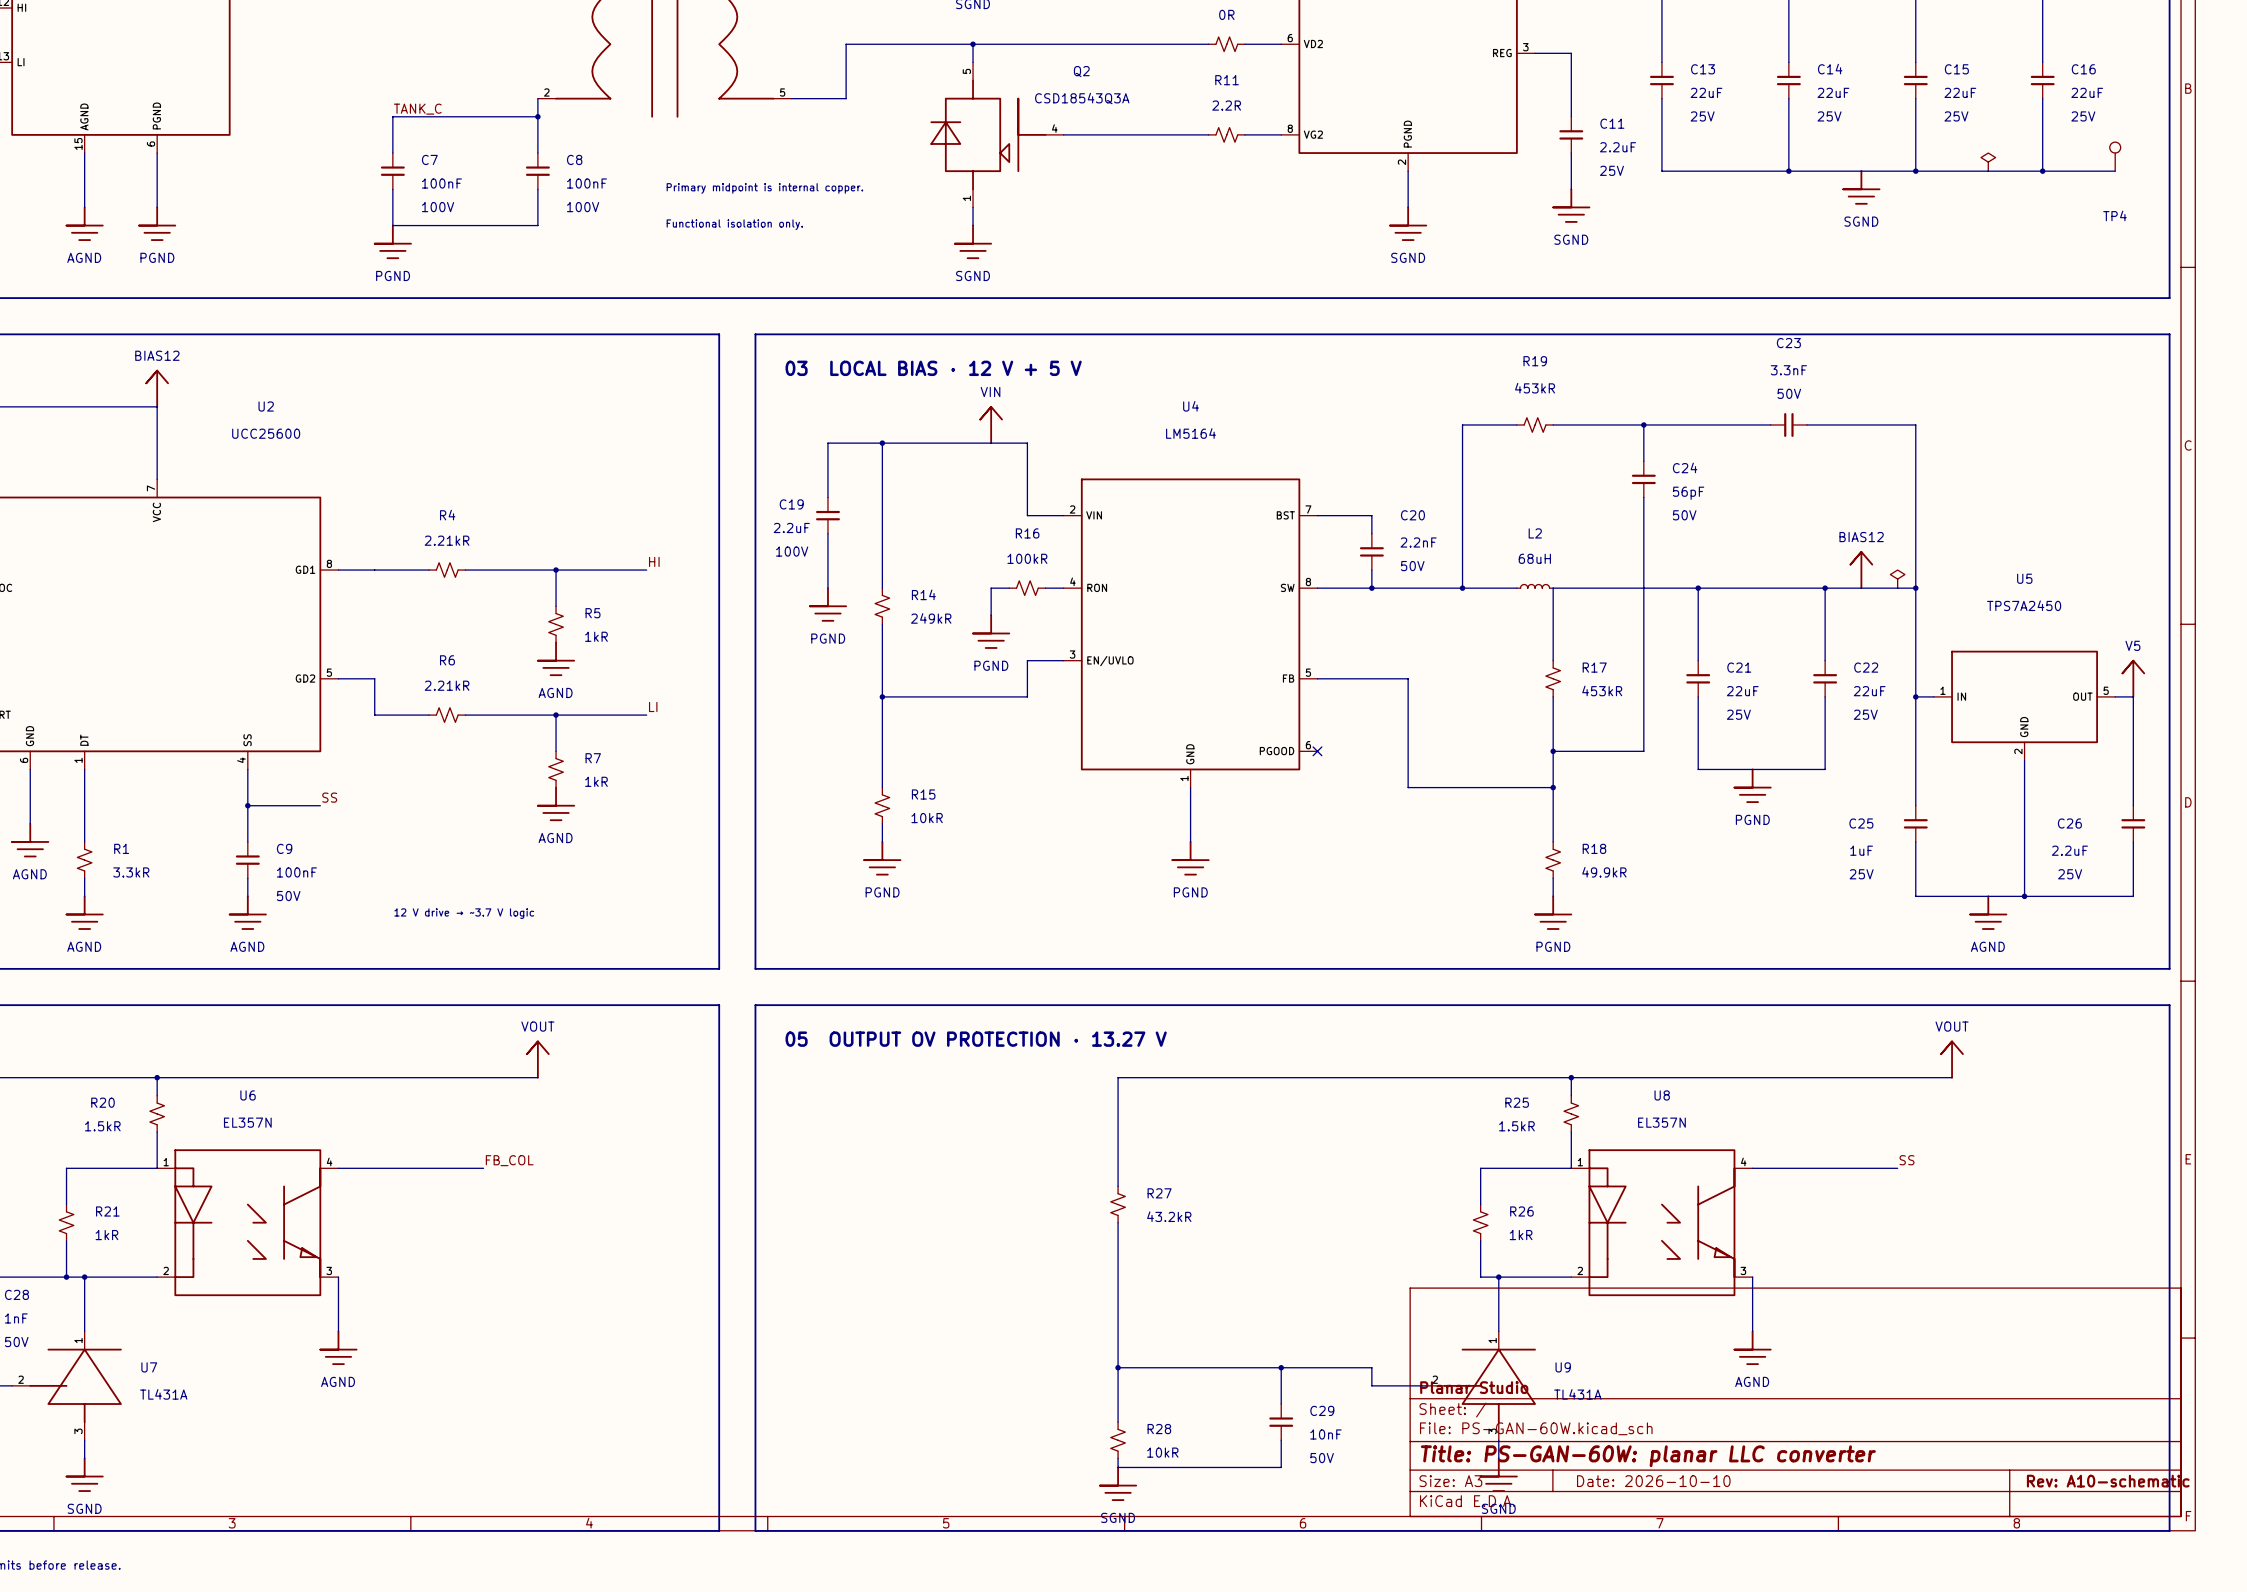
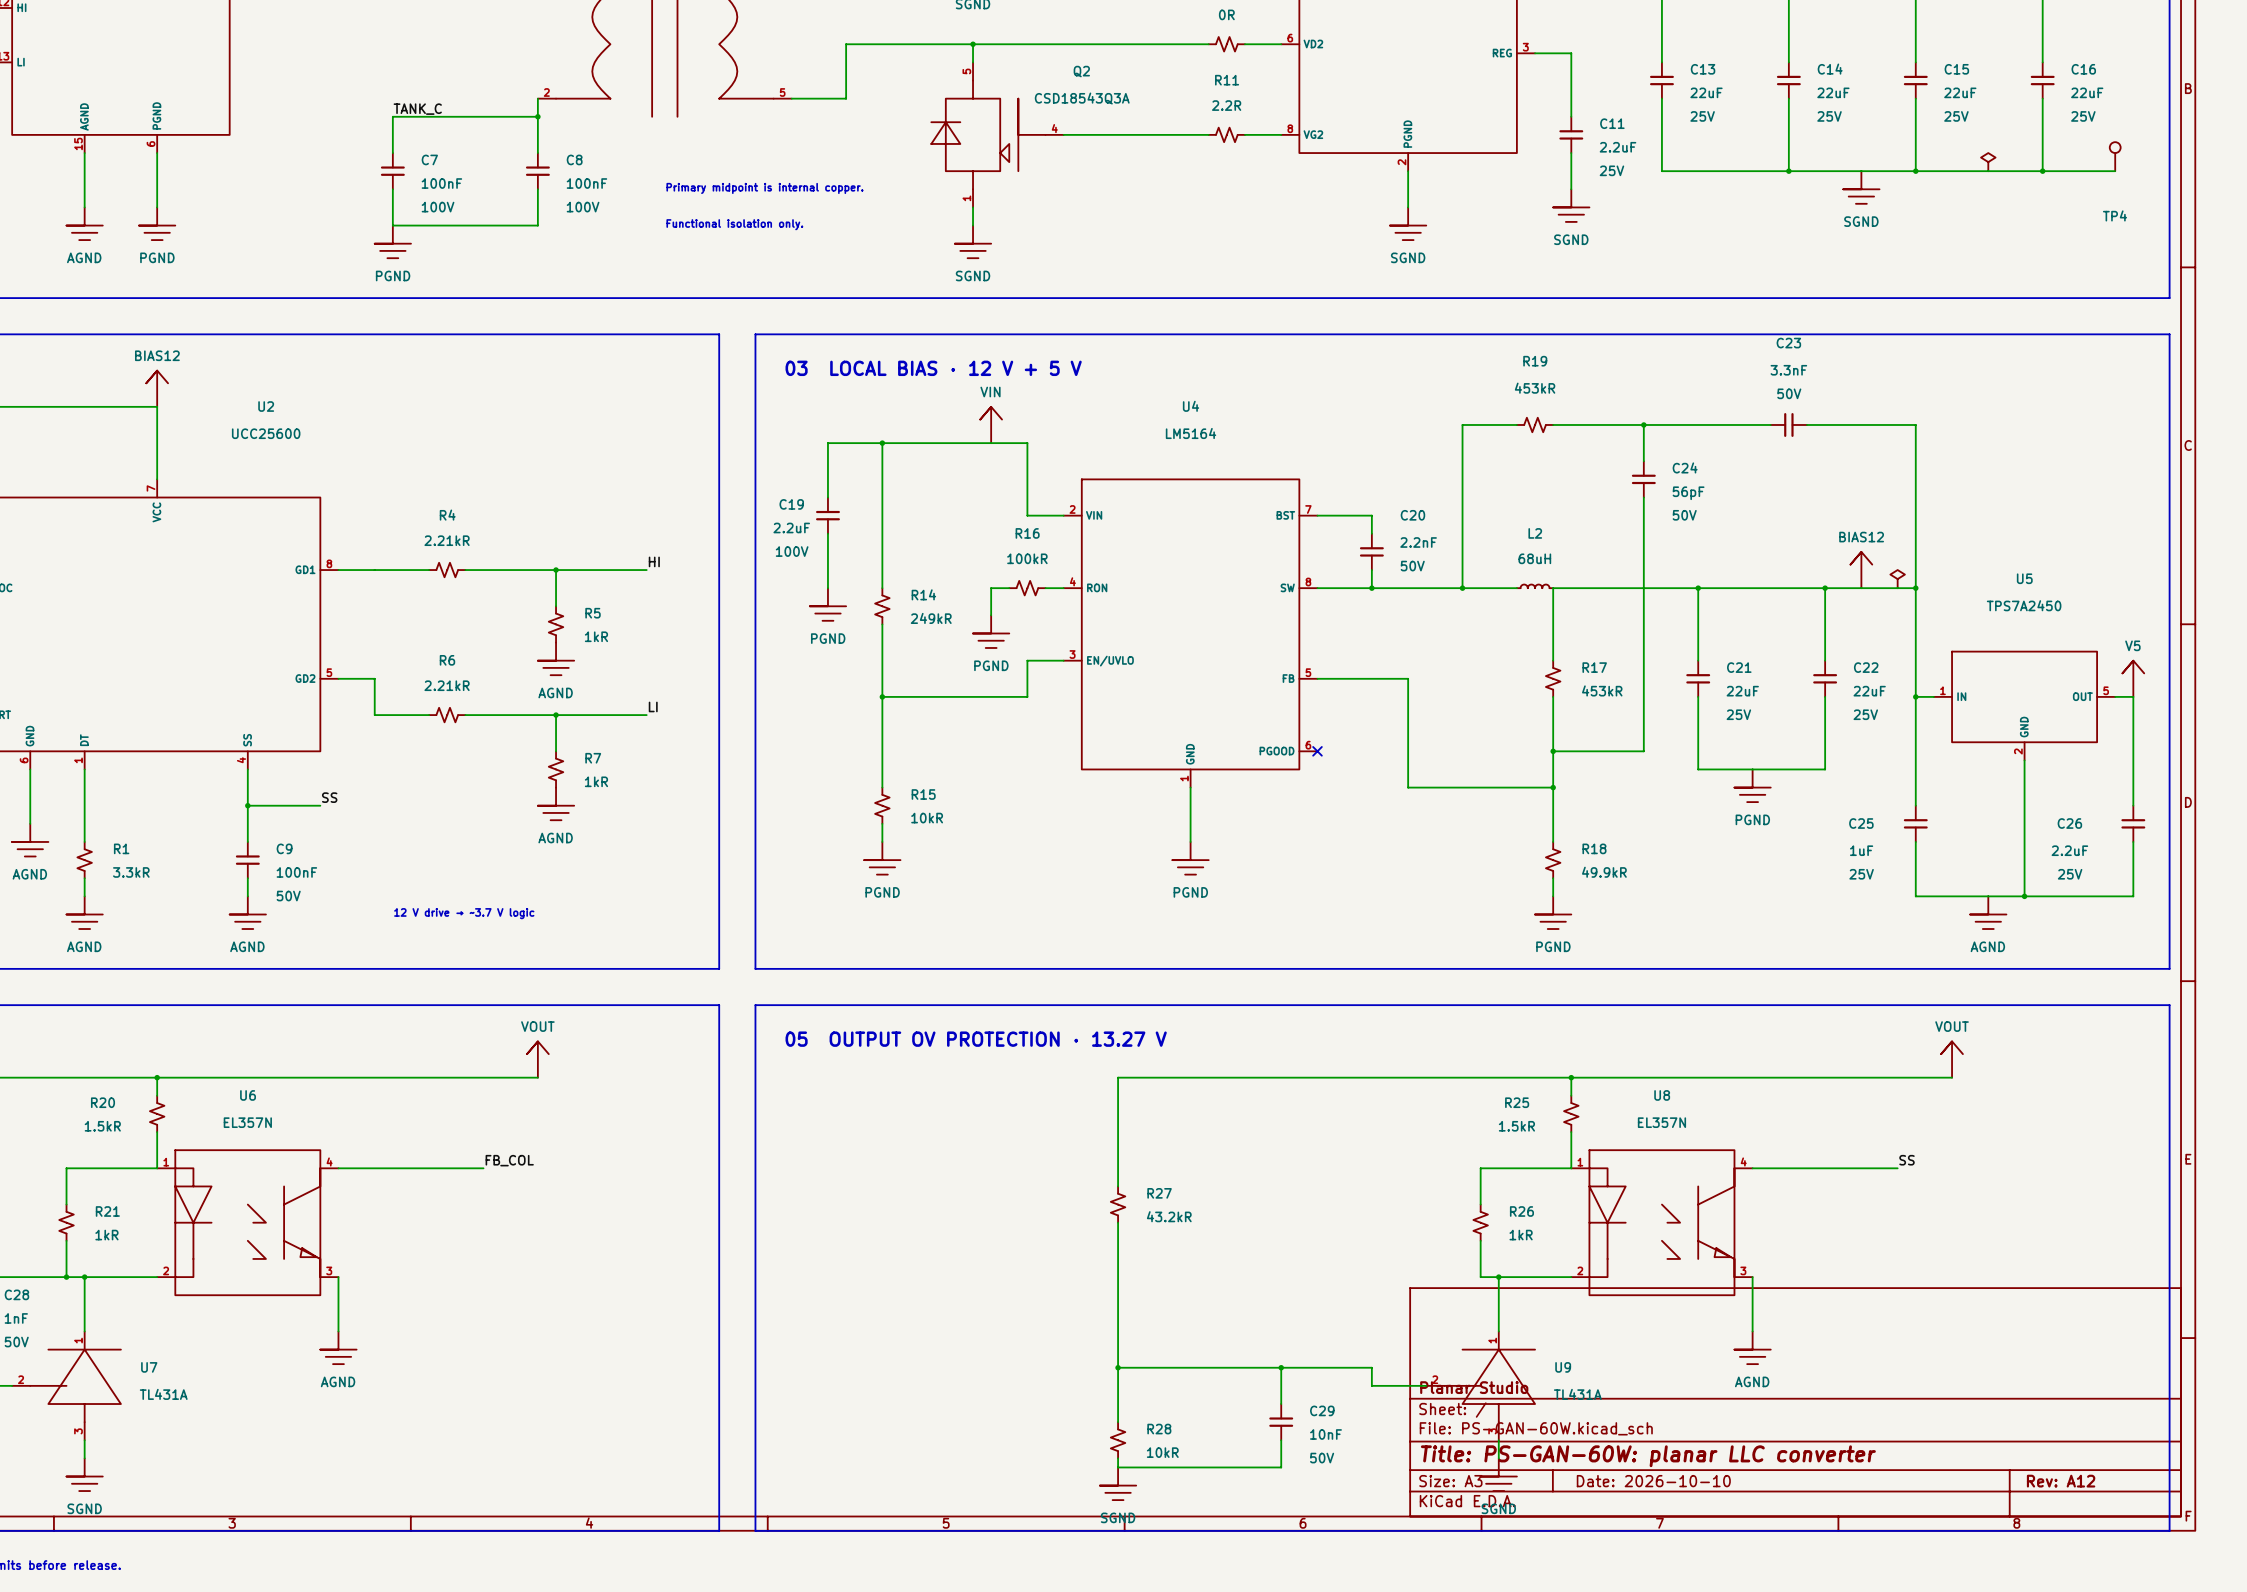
title block: Rev: A10-schematic (2108, 1481) -> Rev: A12 (2061, 1481)

